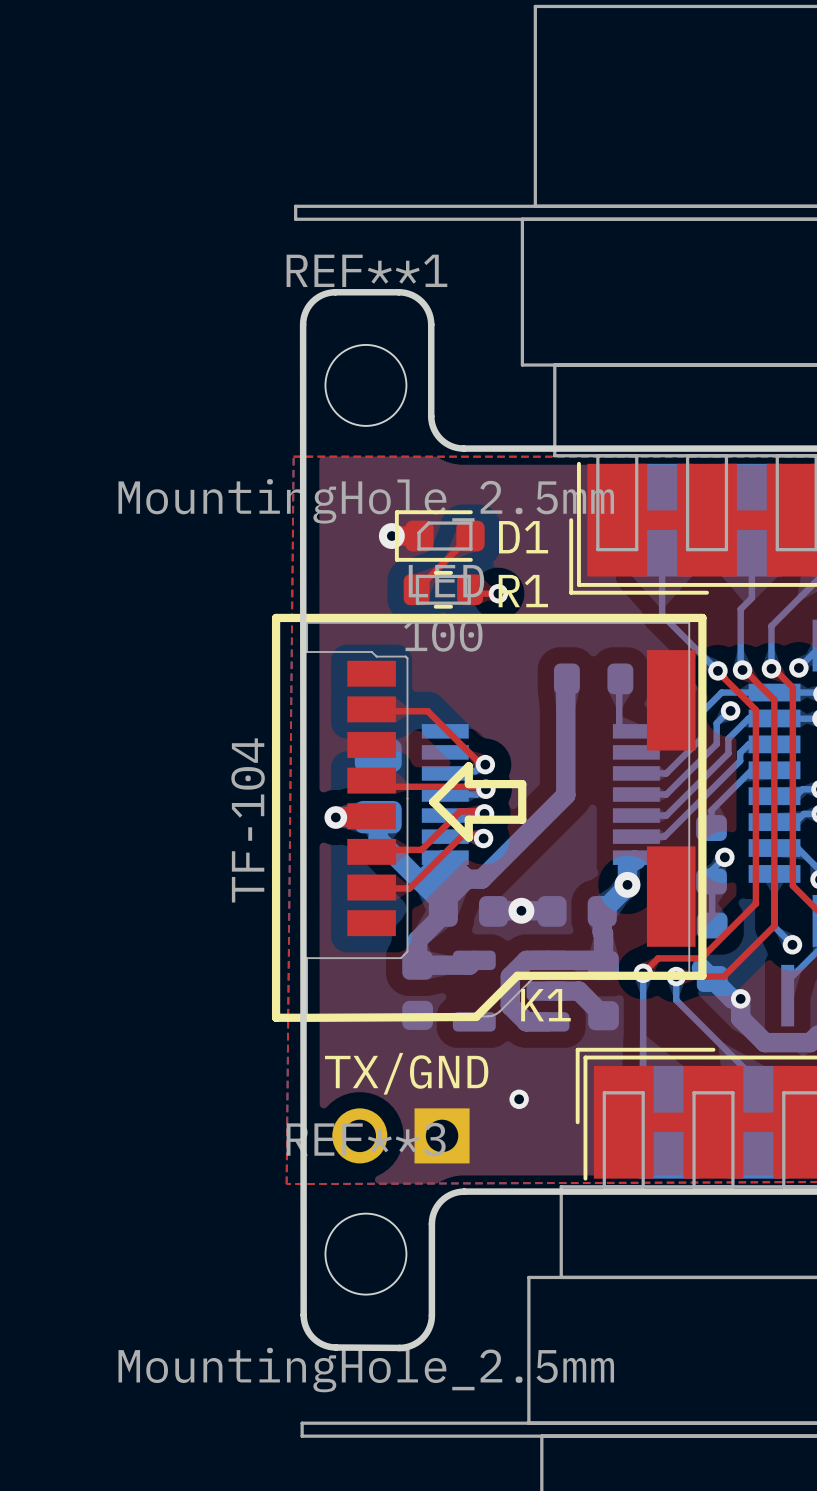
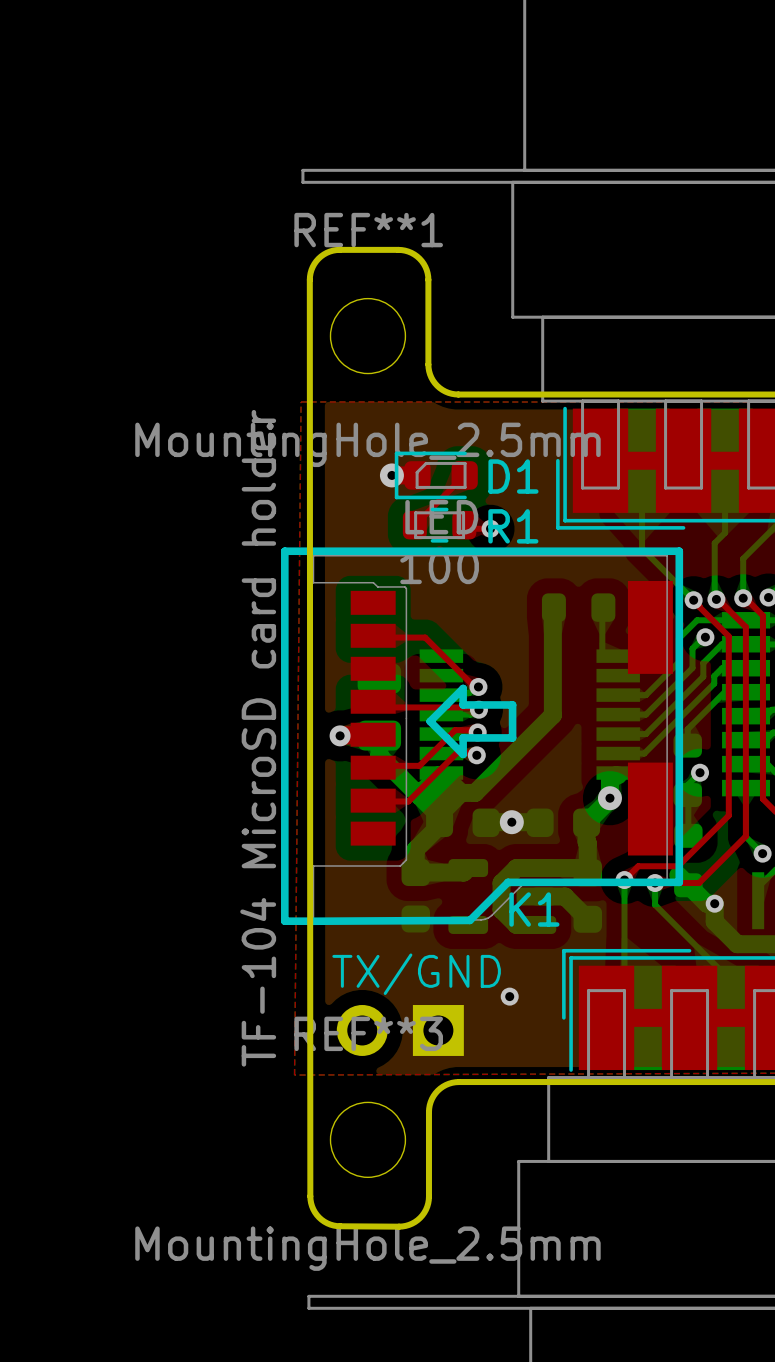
K1 value: TF-104 (248, 820) -> TF-104 MicroSD card holder (258, 738)

